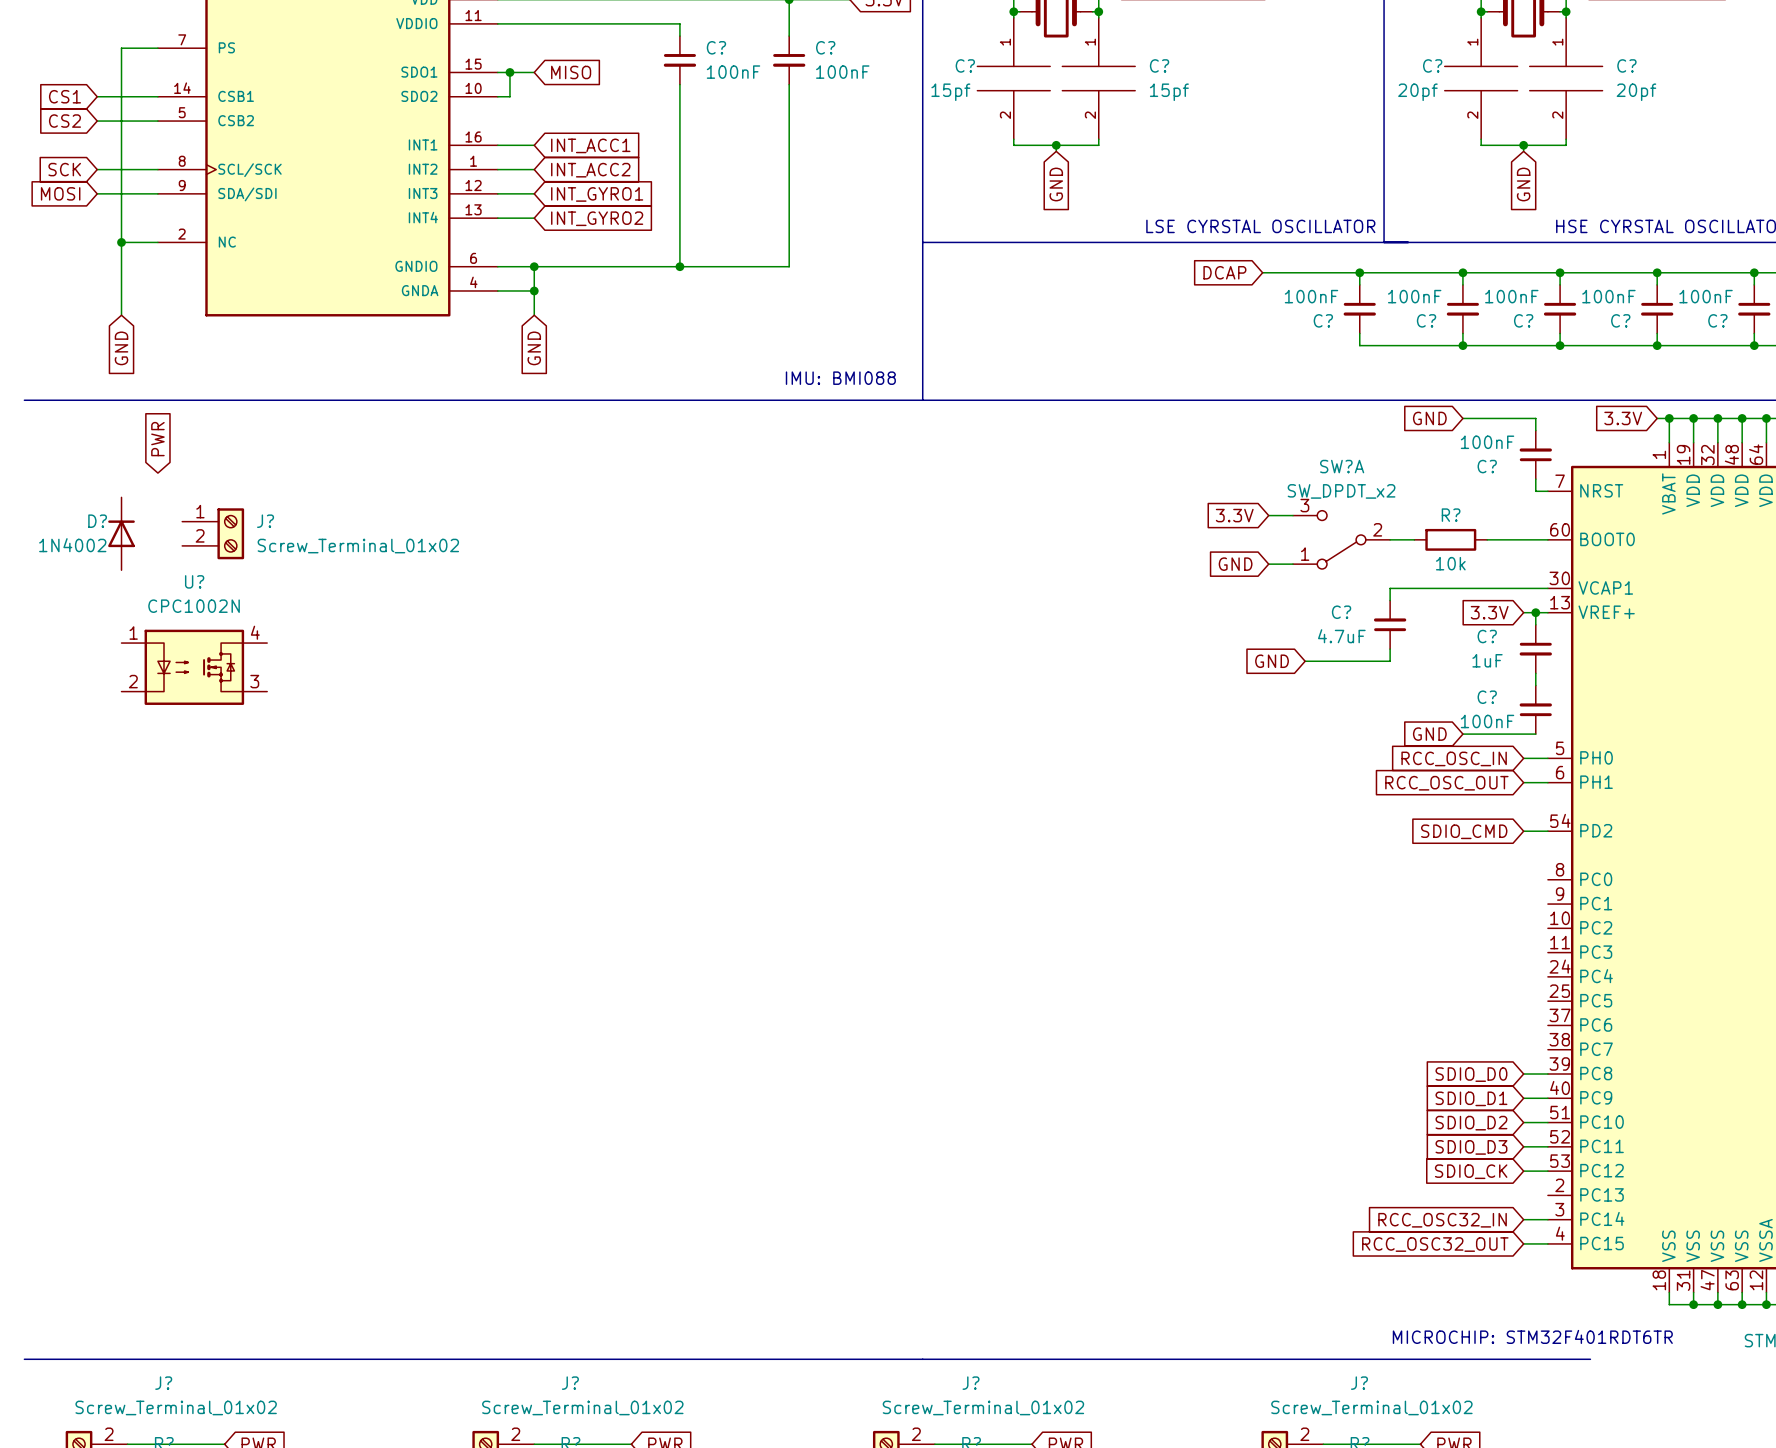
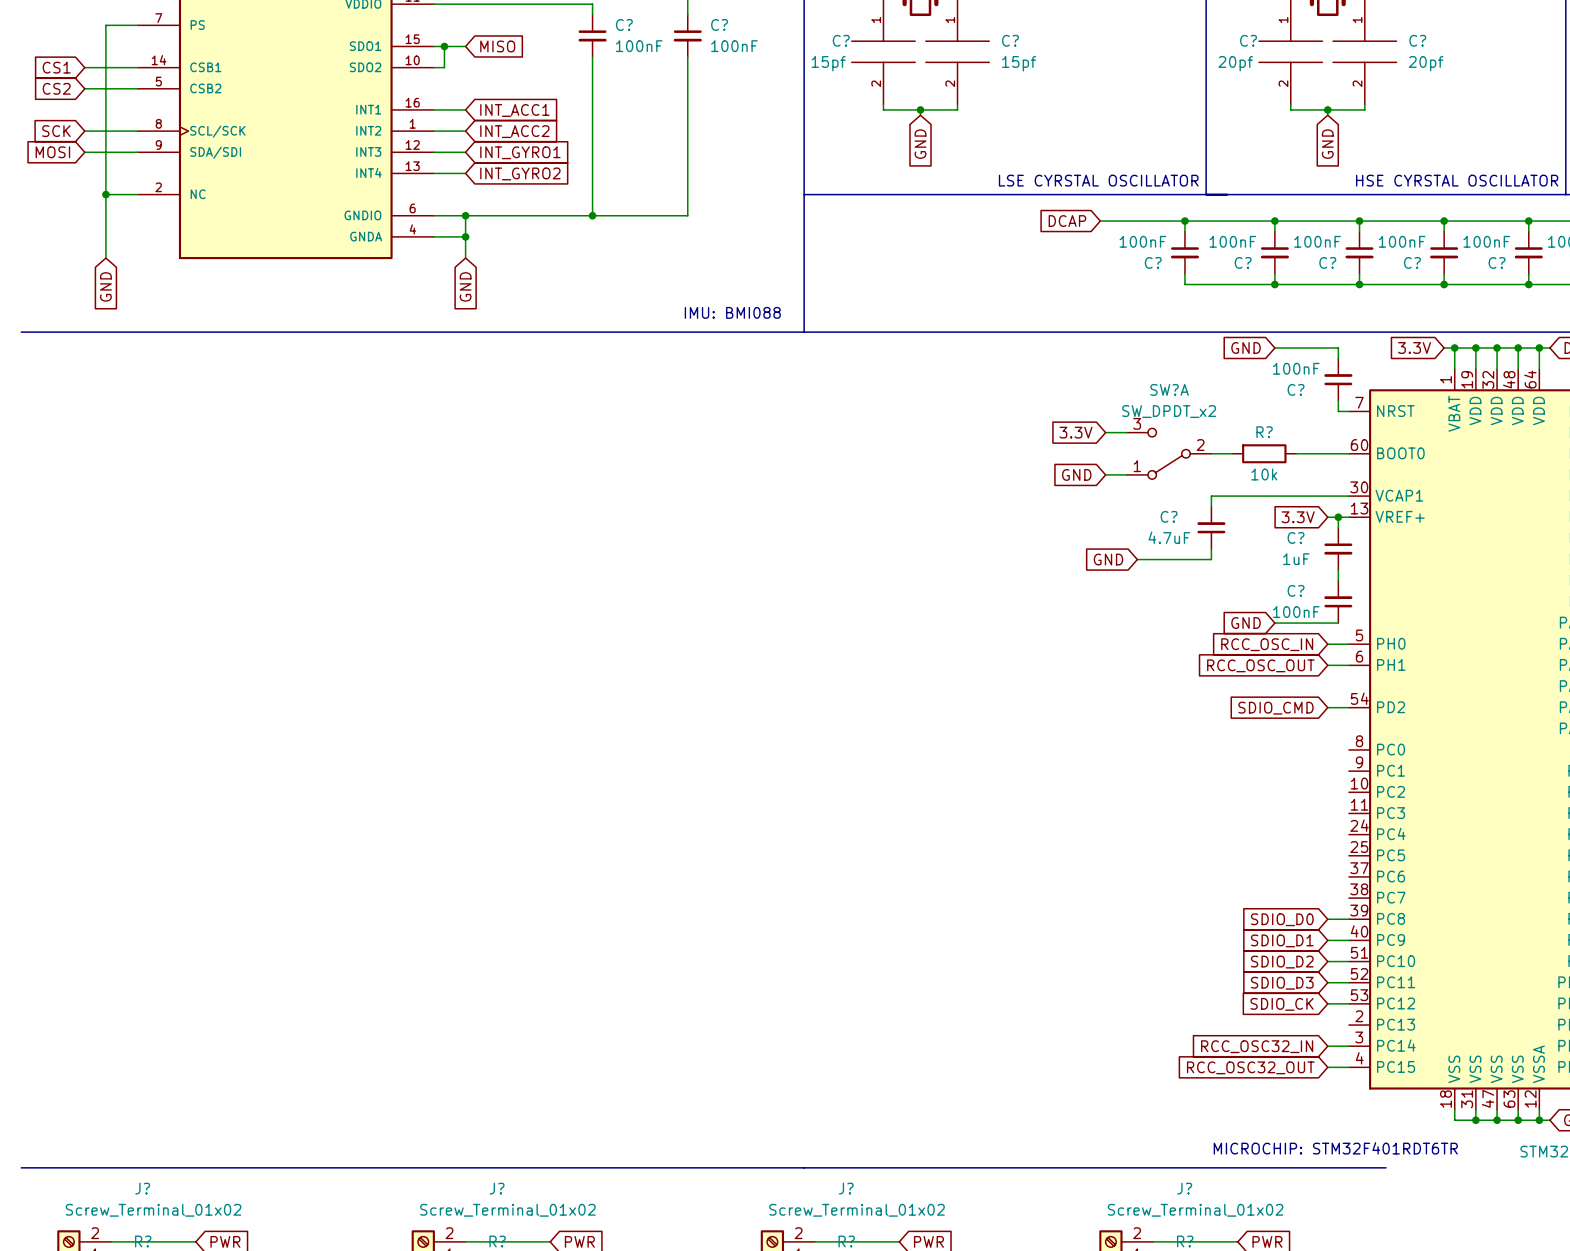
global label: PWR (157, 439) -> none
D?: 1N4002 (121, 533) -> none
J?: Screw_Terminal_01x02 (213, 533) -> none
U?: CPC1002N (194, 667) -> none

